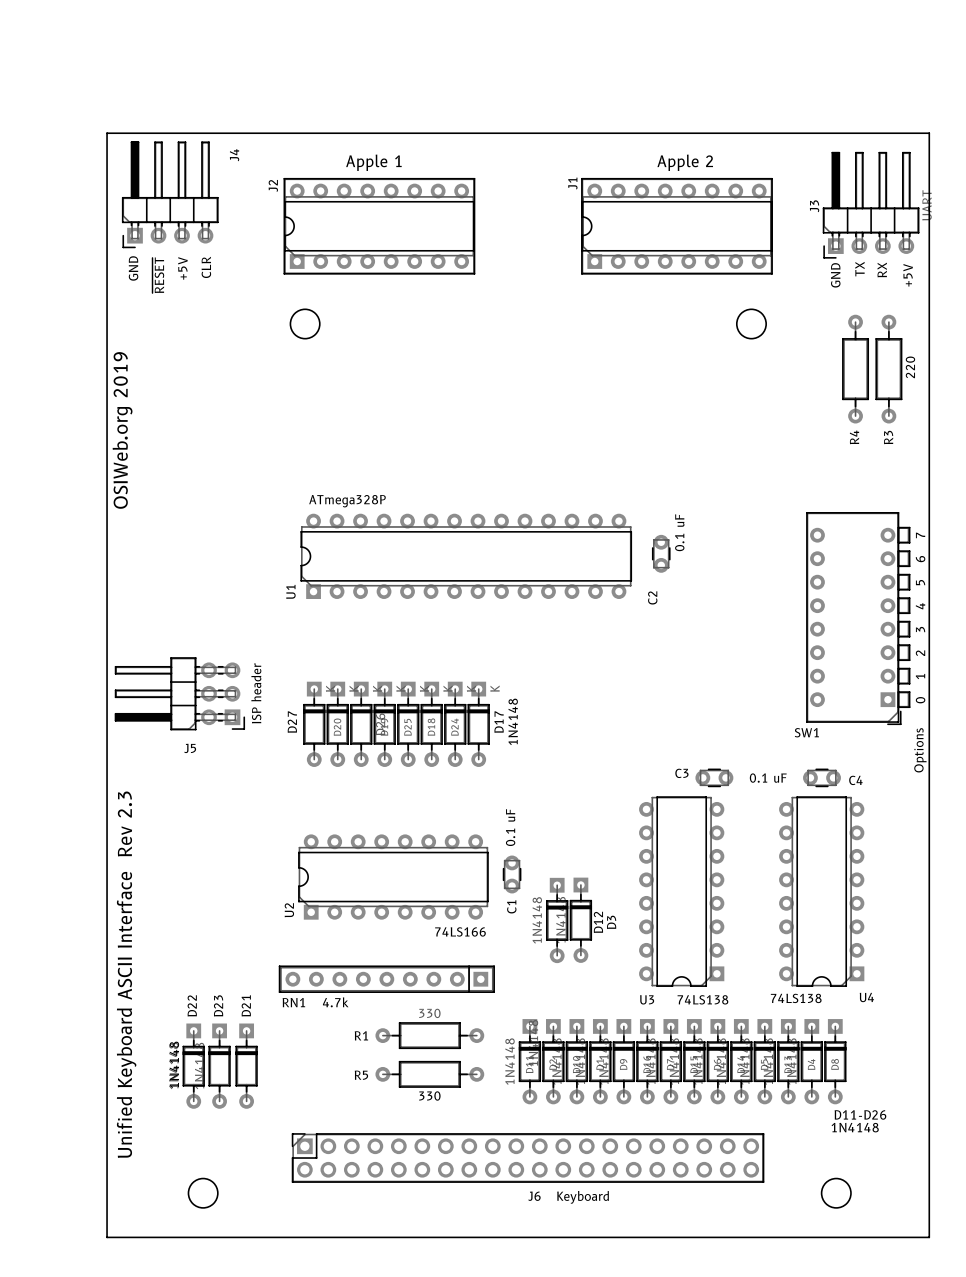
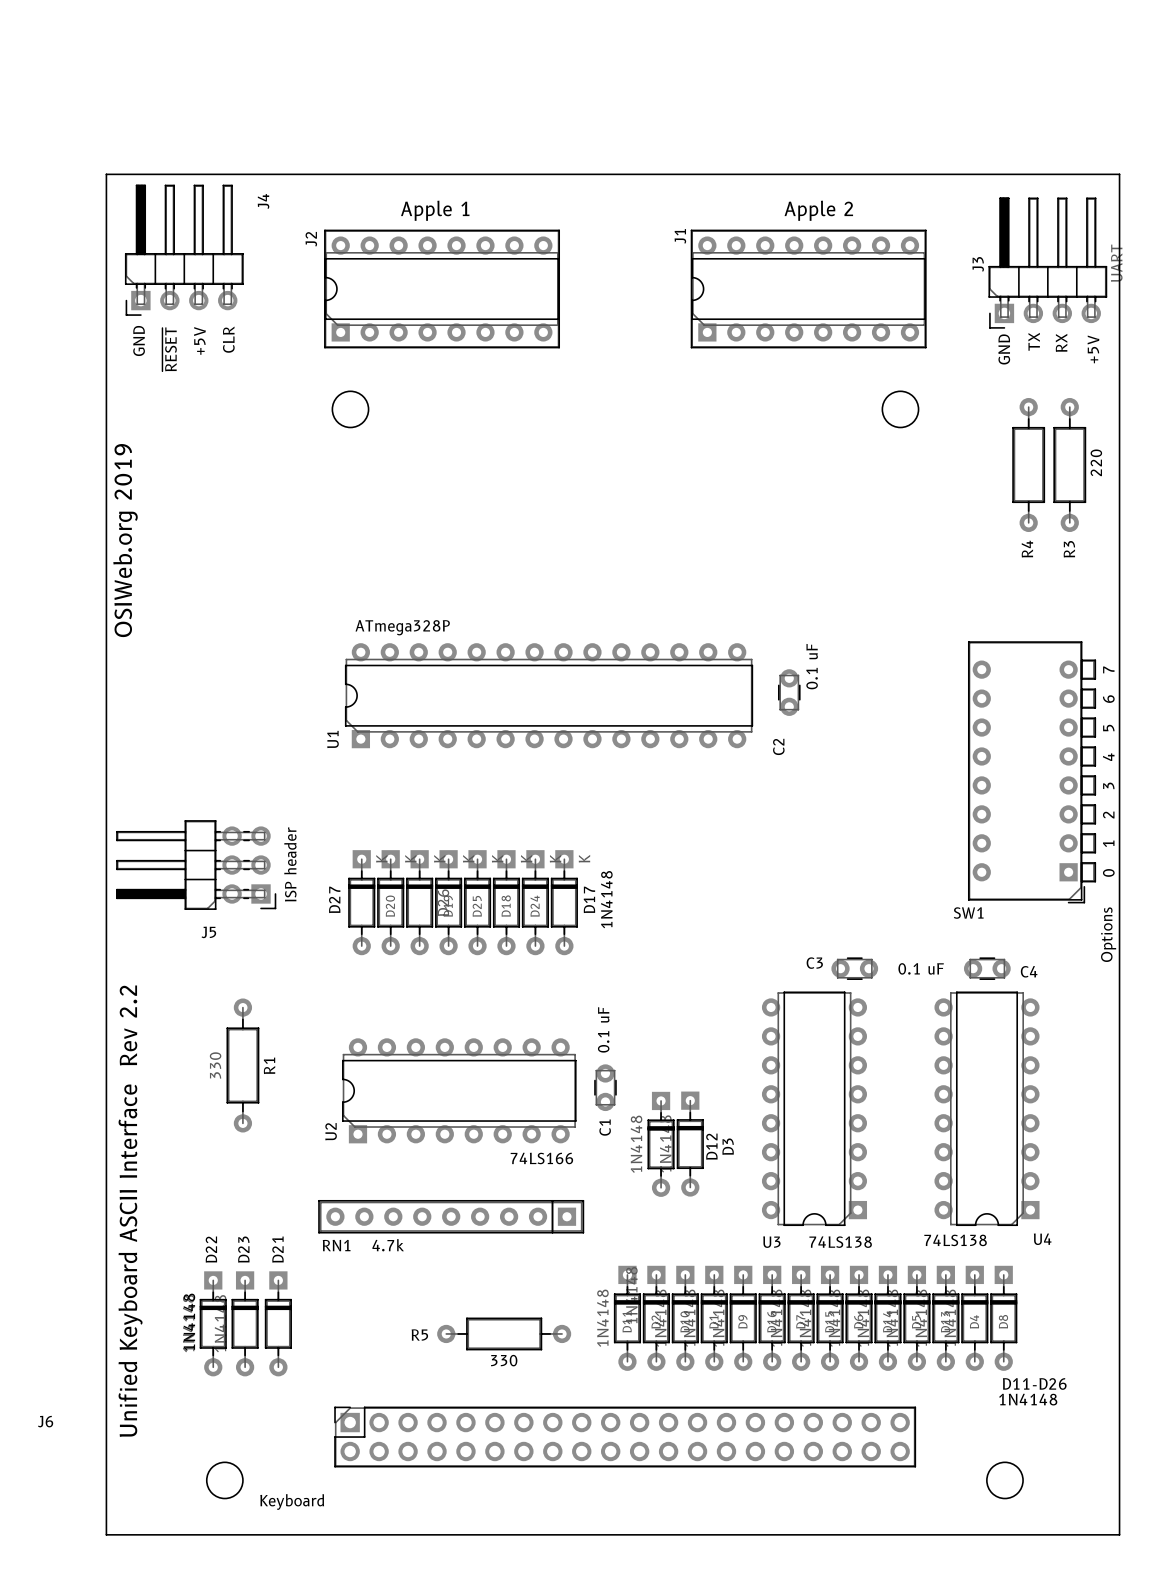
text: Unified Keyboard ASCII Interface Rev 2.3 (126, 974) -> Unified Keyboard ASCII Interface Rev 2.2 (130, 1211)
R1 value position: 330 (429, 1013) -> 330 (215, 1065)
R1 name position: R1 (361, 1035) -> R1 (269, 1065)
R1 rotation: 0° (429, 1035) -> 90° clockwise (242, 1065)
R1 position: (429, 1035) -> (242, 1065)
J6 name position: J6 (534, 1196) -> J6 (45, 1421)
J6 value position: Keyboard (583, 1197) -> Keyboard (292, 1501)

